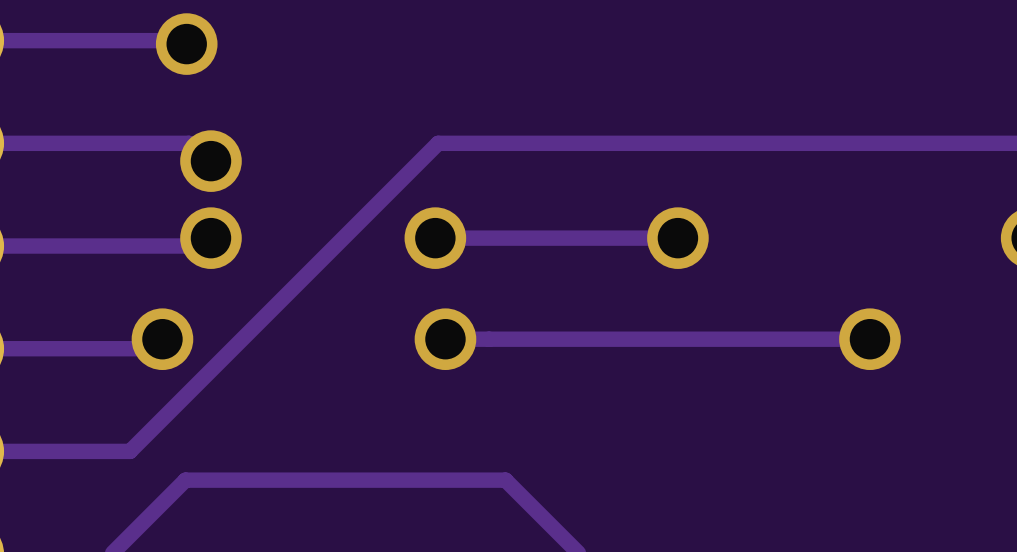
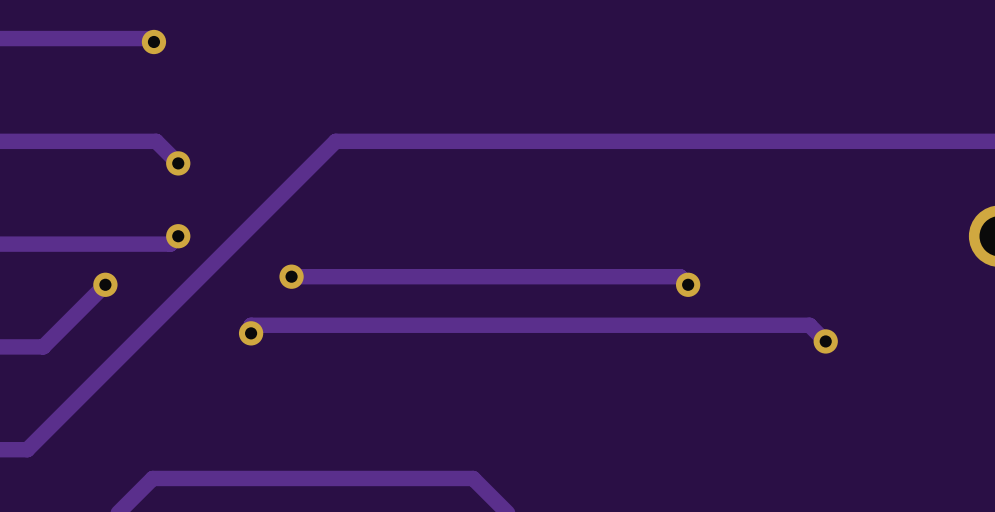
via size: [155, 13, 218, 75] -> [141, 29, 167, 55]
via size: [180, 130, 242, 192] -> [166, 151, 191, 176]
track: (438, 143) (130, 451) (60, 451) -> (405, 141) (335, 141) (27, 449)
via size: [180, 207, 242, 269] -> [166, 224, 191, 249]
via: (435, 238) -> none
track: (677, 238) (435, 238) -> none
via: (677, 238) -> none
track: none -> (291, 276) (680, 276) (688, 284)
via: none -> (291, 276)
via: none -> (105, 284)
via: none -> (688, 284)
via size: [839, 308, 901, 371] -> [813, 329, 838, 354]
track: none -> (251, 333) (251, 325) (809, 325) (825, 341)
via: none -> (251, 333)
track: (162, 339) (152, 348) (76, 348) -> (105, 284) (43, 346)
via: (162, 339) -> none
via: (445, 339) -> none
track: (869, 339) (445, 339) -> none

